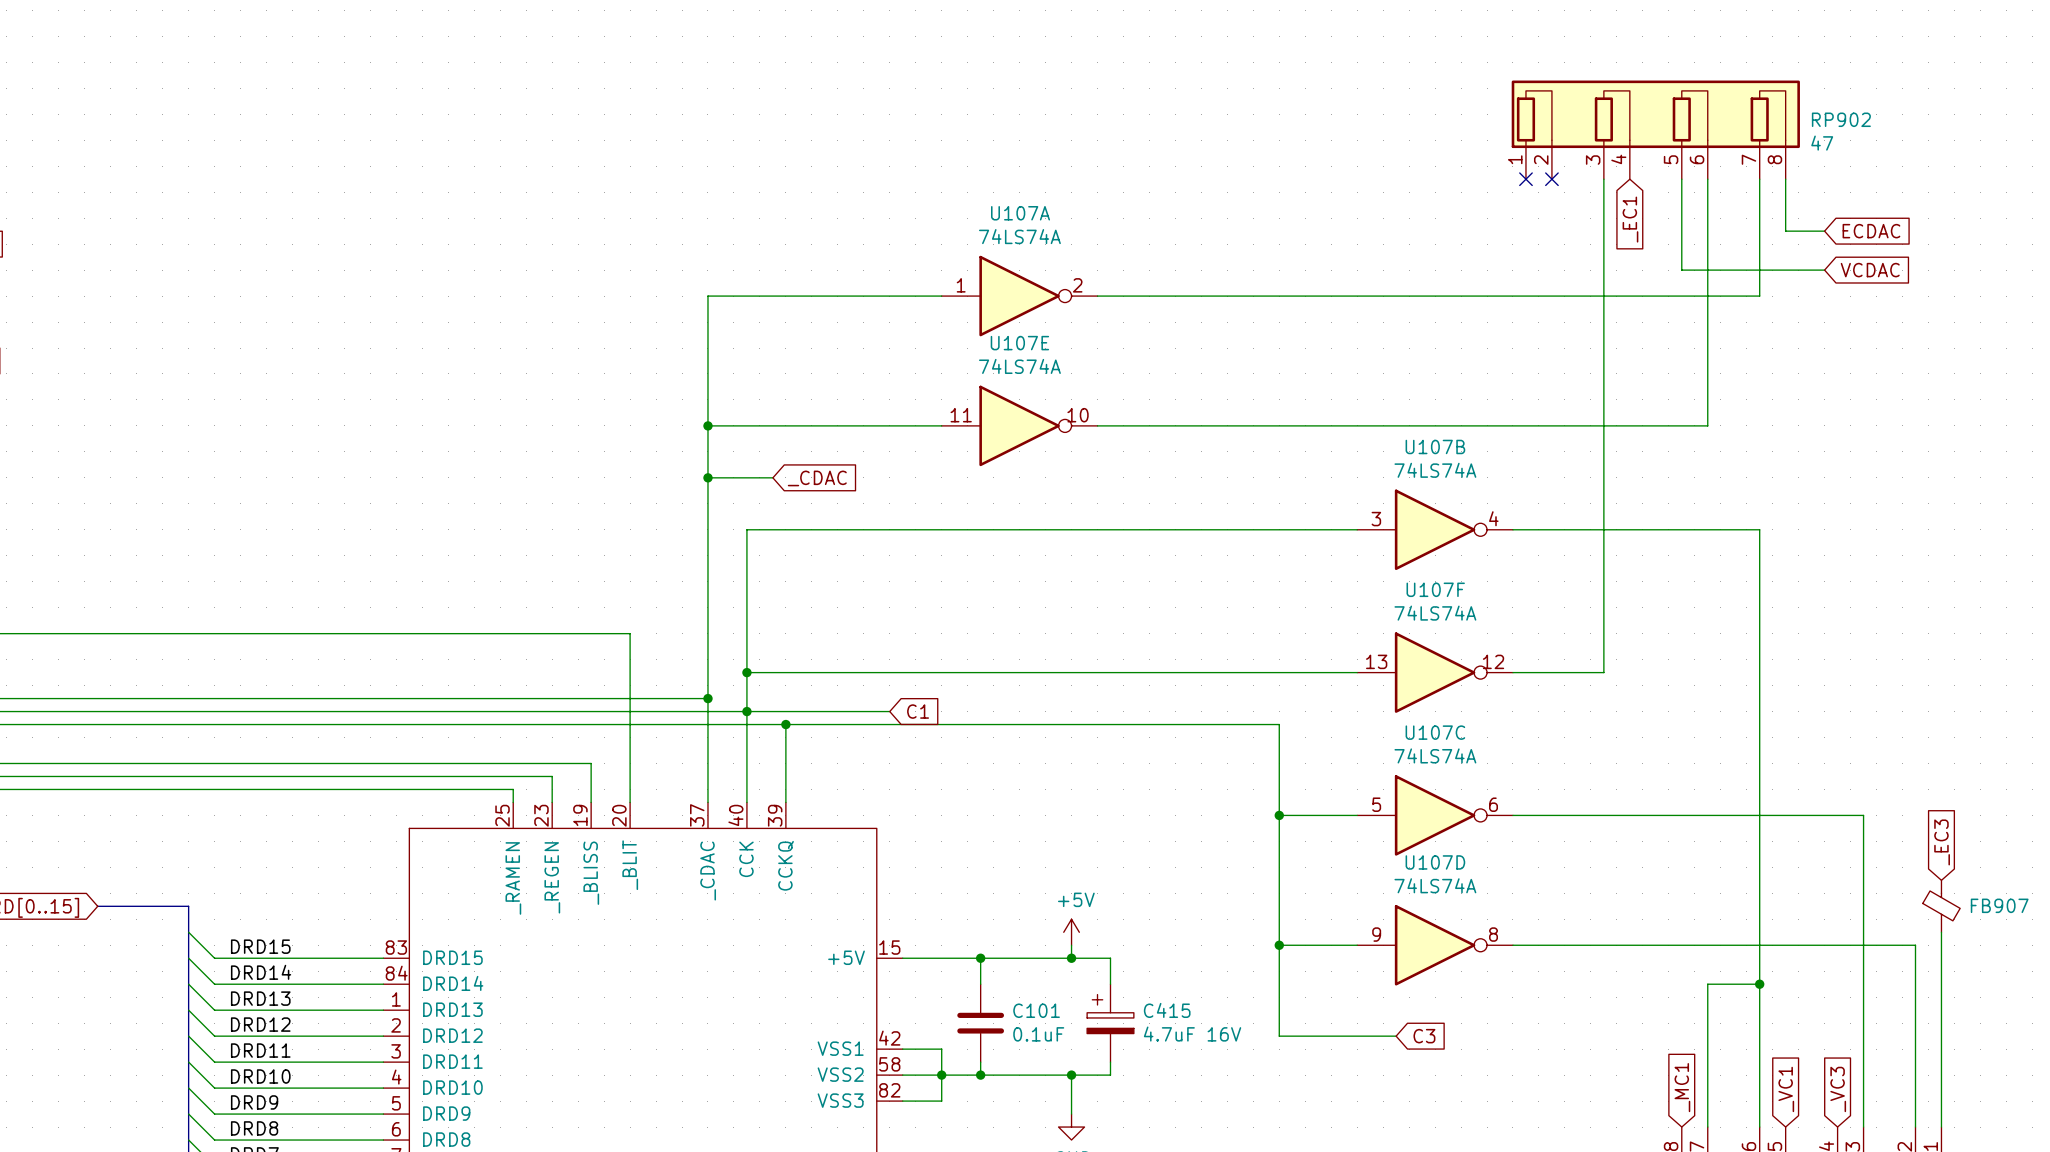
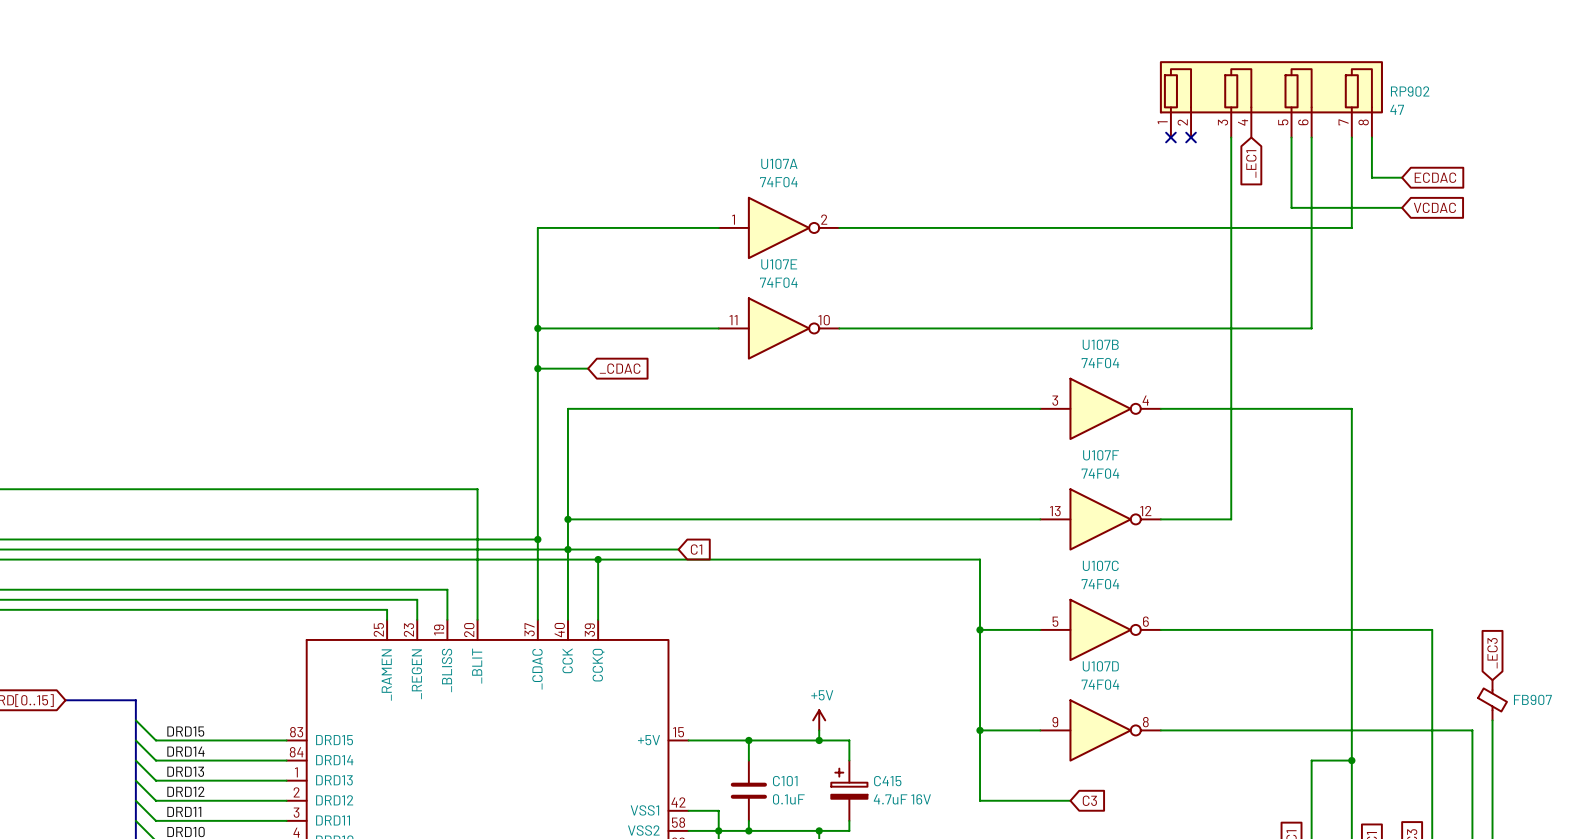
U107A value: 74LS74A (1019, 236) -> 74F04 (778, 182)
U107E value: 74LS74A (1019, 366) -> 74F04 (778, 282)
U107B value: 74LS74A (1435, 470) -> 74F04 (1100, 363)
U107F value: 74LS74A (1435, 613) -> 74F04 (1100, 473)
U107C value: 74LS74A (1435, 755) -> 74F04 (1100, 584)
U107D value: 74LS74A (1435, 885) -> 74F04 (1100, 684)

